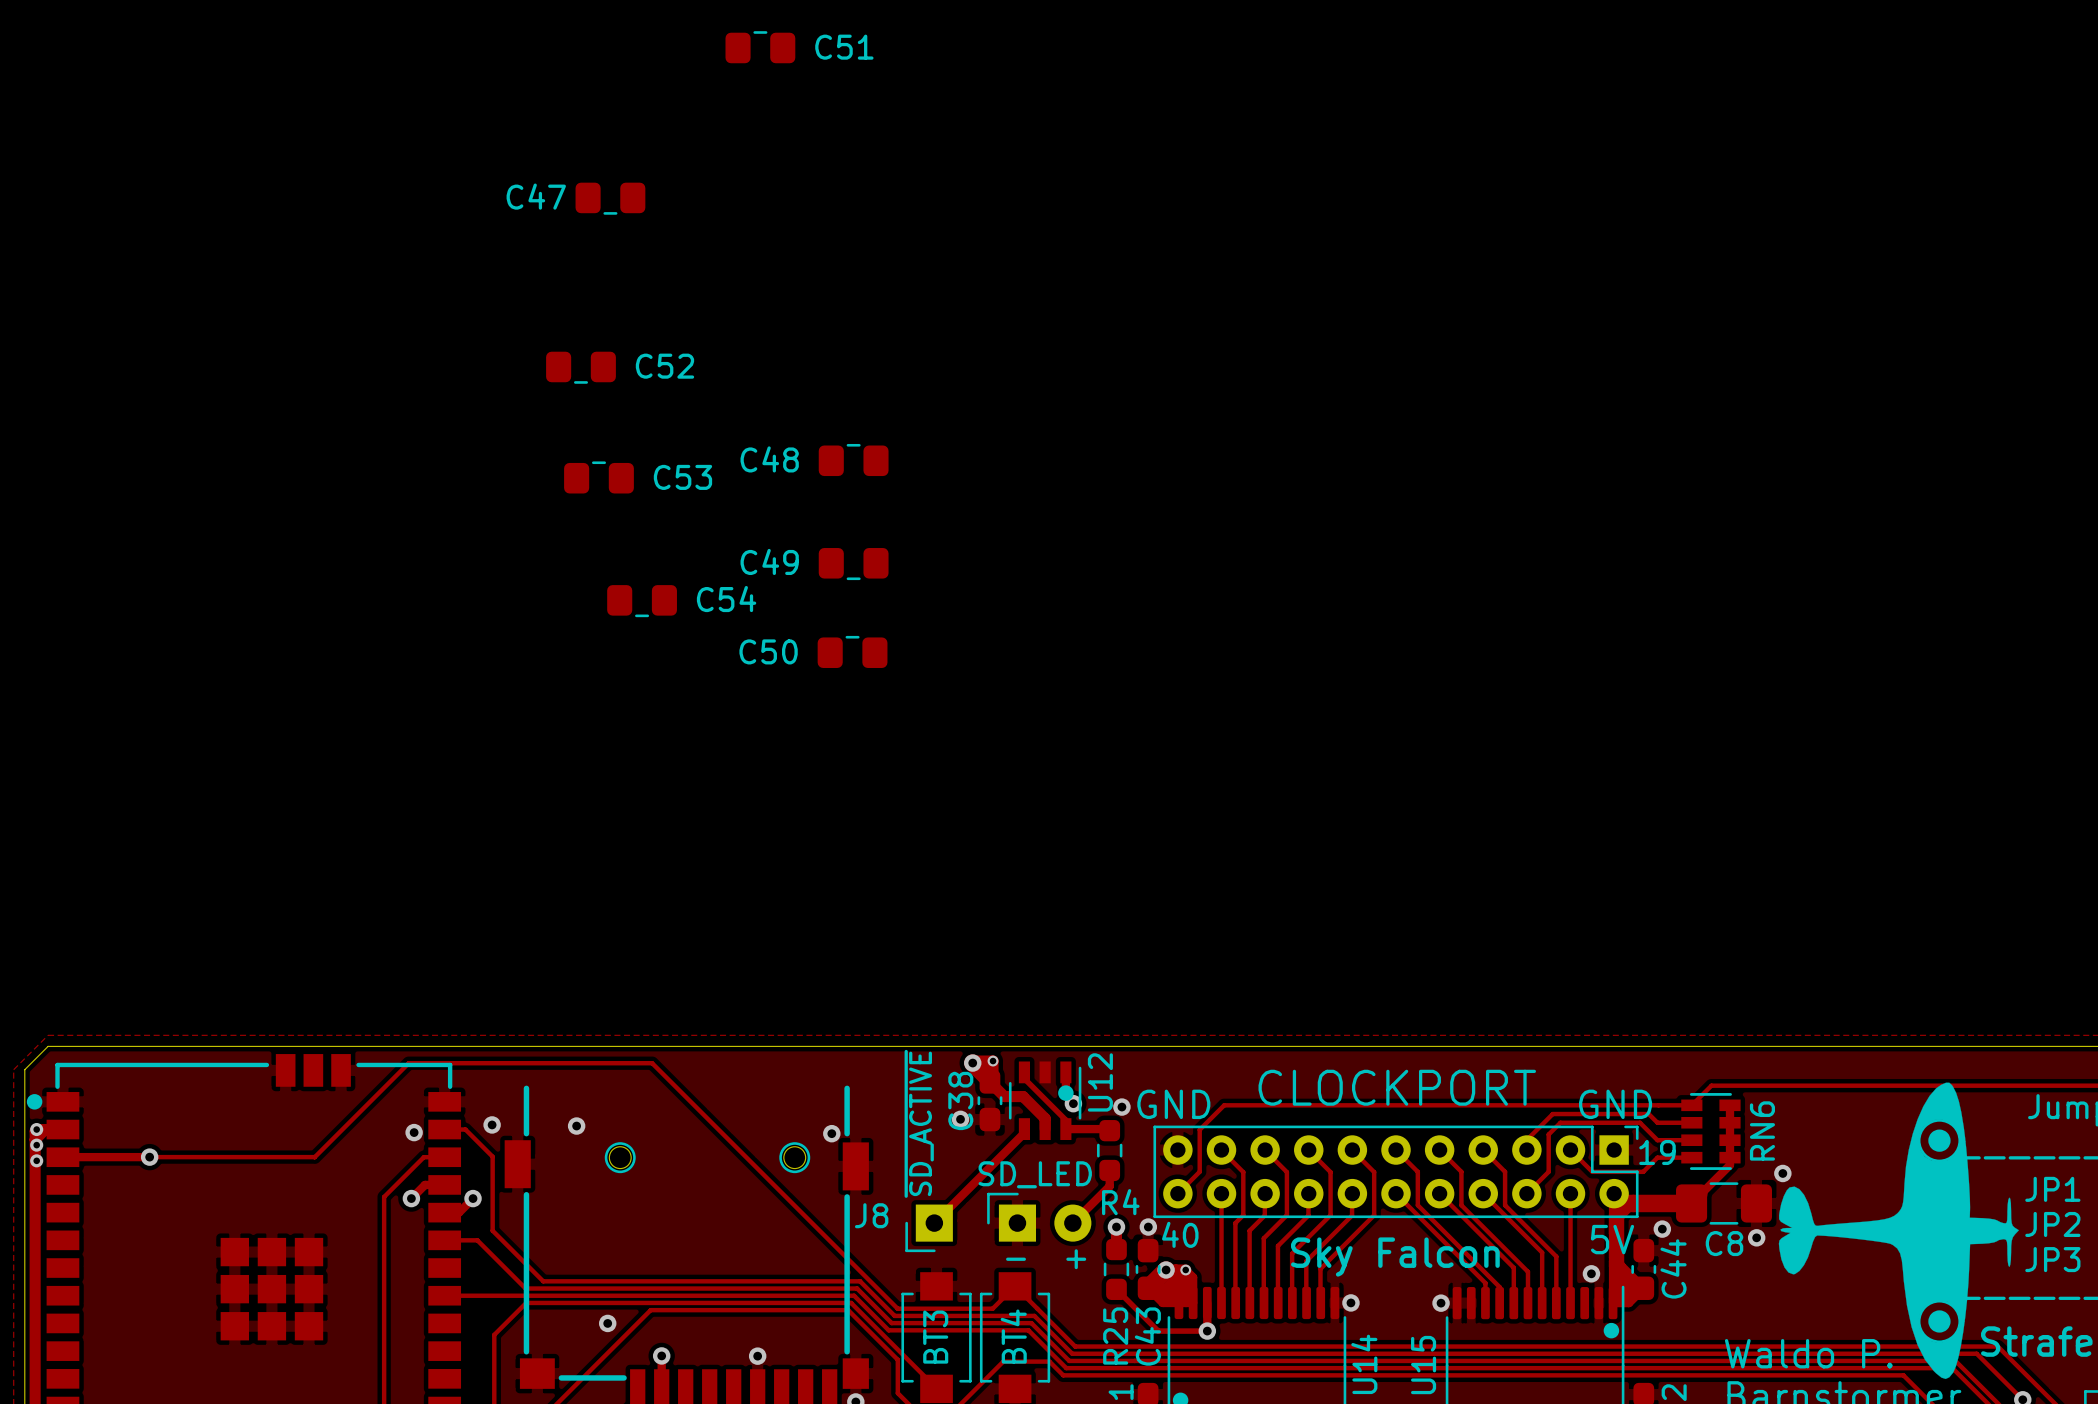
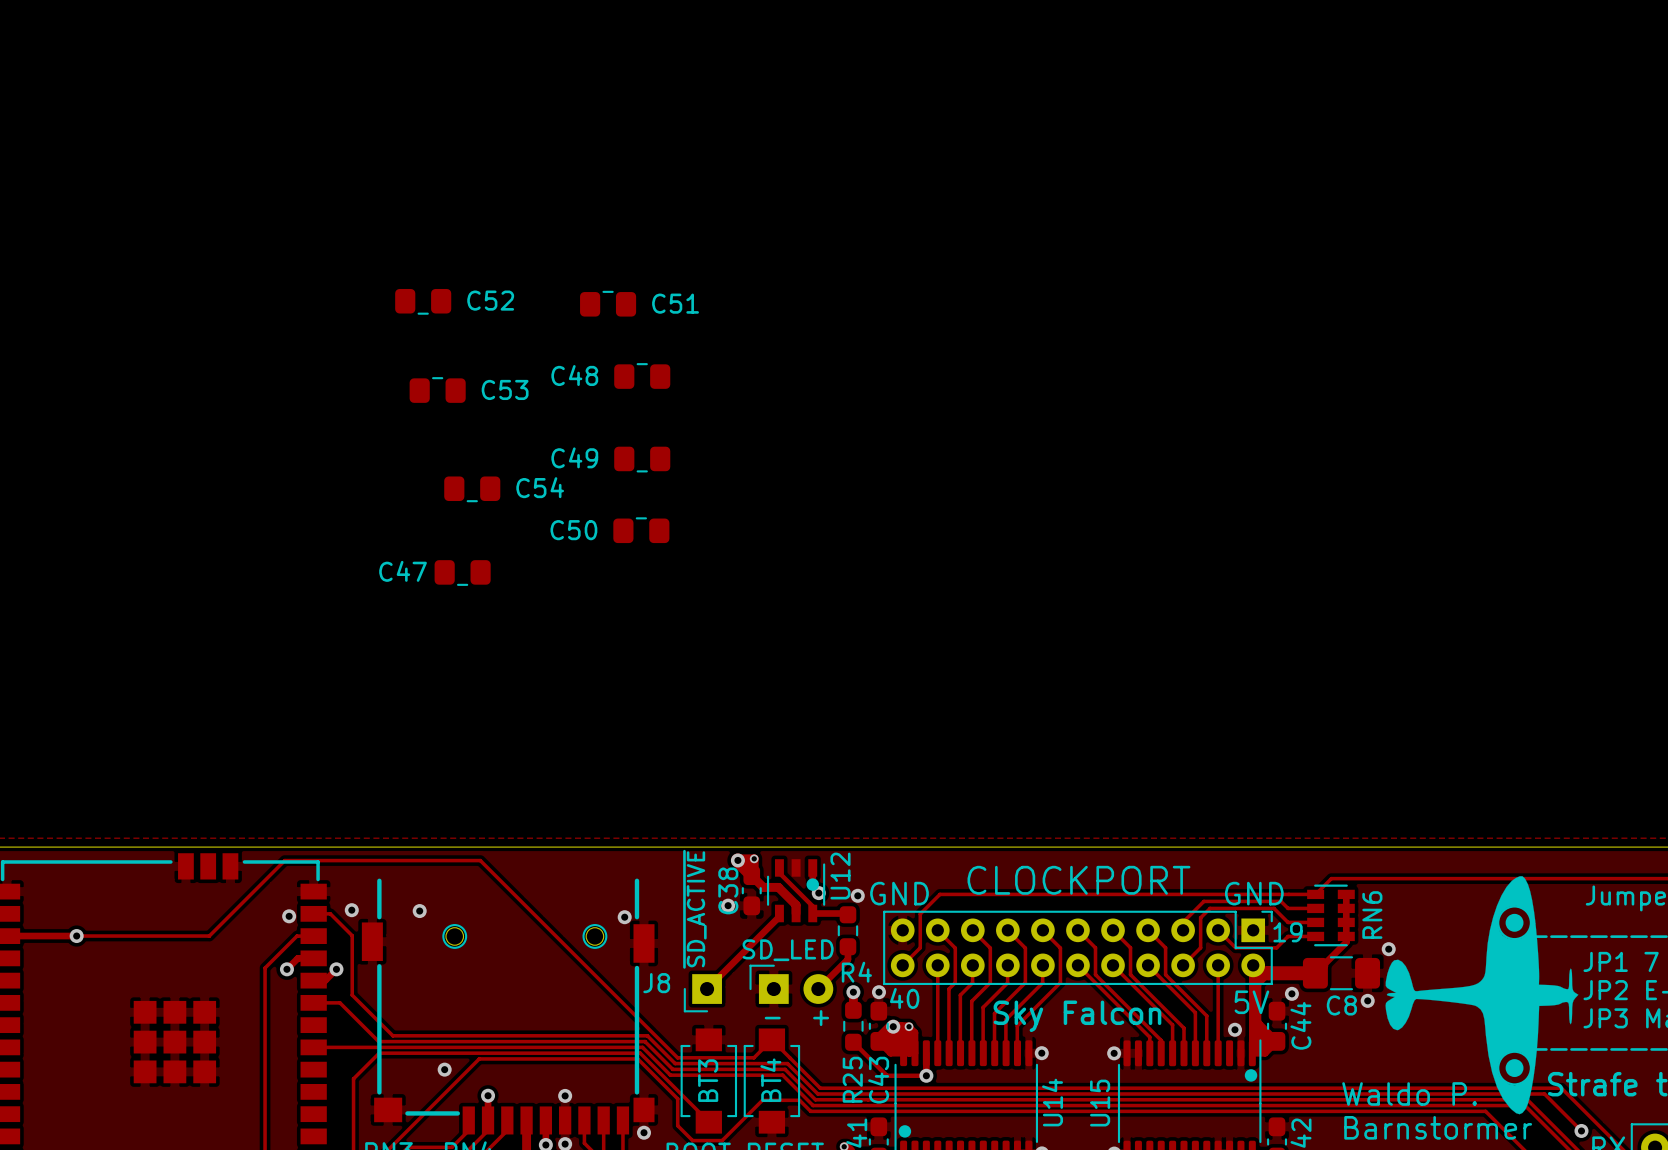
C51 position: (760, 47) -> (608, 303)
C47 position: (610, 198) -> (462, 573)

